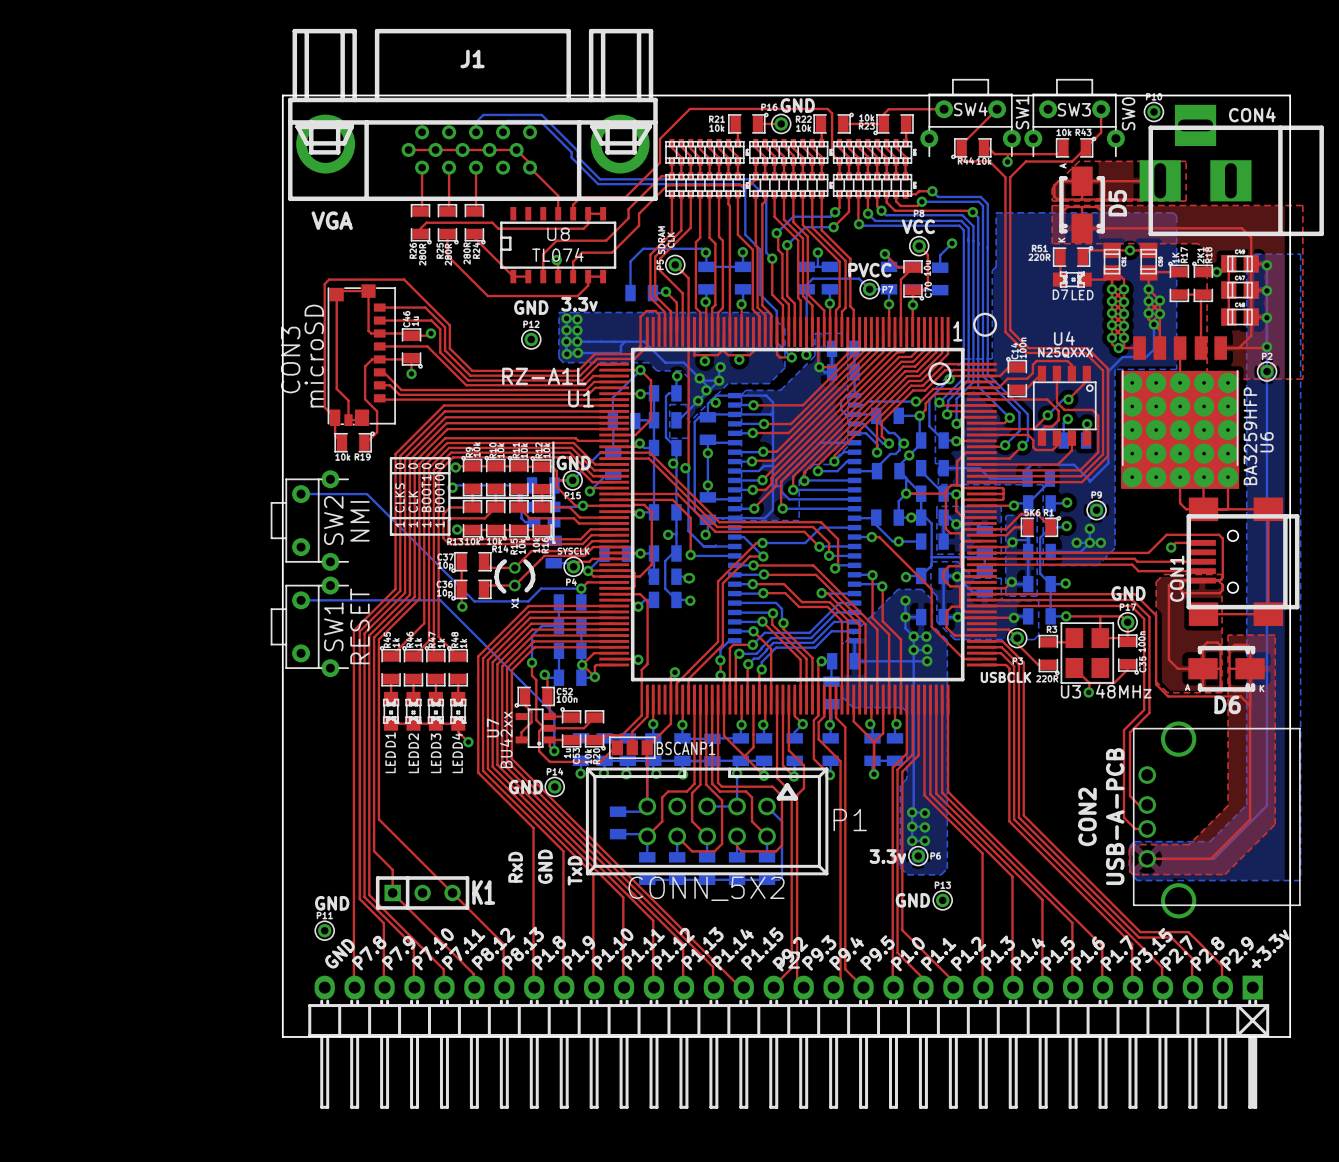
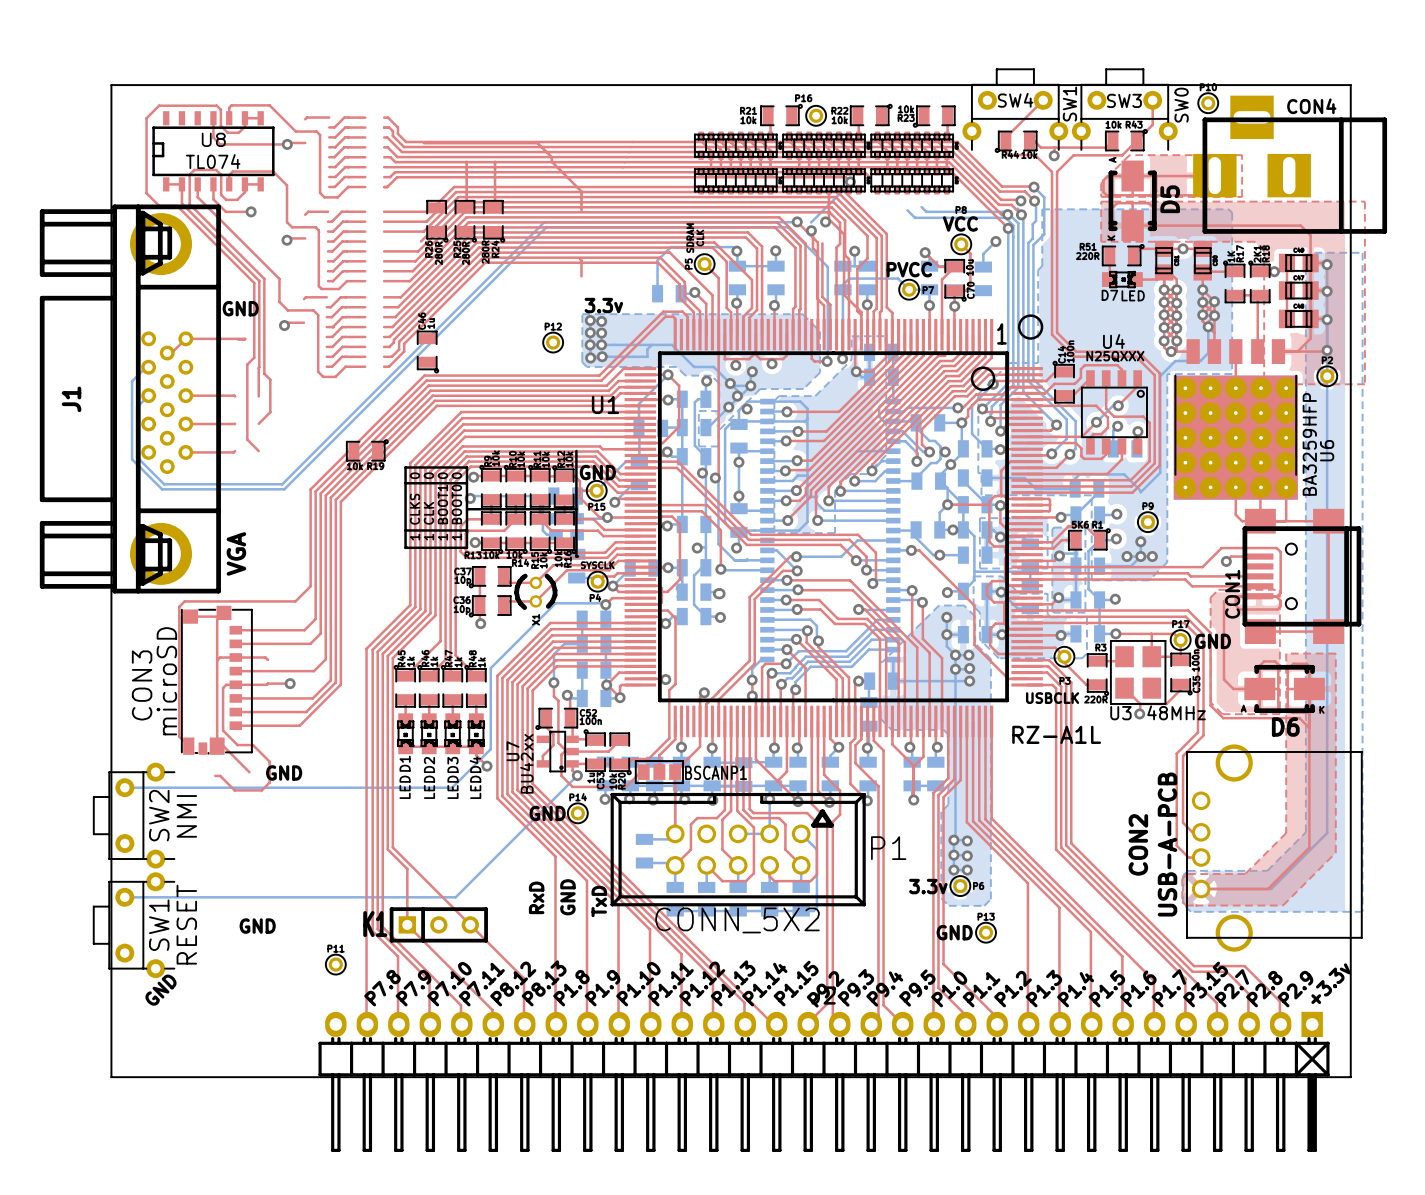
board edge: (282, 95) (1290, 95) (1290, 1036) (282, 1036) (282, 95) -> (111, 85) (111, 1077) (1350, 1077) (1350, 85) (111, 85)
text: GND (797, 105) -> none
top track: (944, 109) (888, 109) (883, 114) (883, 123) (843, 123) -> none
J1 rotation: 0° (472, 114) -> 90° counterclockwise (130, 398)
J1 position: (472, 114) -> (130, 398)
top track: (758, 123) (781, 123) -> none
top track: none -> (329, 117) (307, 117) (305, 119)
top track: none -> (365, 117) (344, 117) (334, 127) (329, 127)
top track: none -> (384, 117) (388, 117) (397, 127) (397, 133) (406, 141) (957, 141) (1002, 186) (1034, 187)
top track: none -> (213, 118) (213, 137) (220, 144) (305, 142)
top track: none -> (229, 118) (229, 107) (231, 105) (269, 105) (295, 131) (316, 131) (320, 135) (320, 192) (324, 197) (337, 197) (348, 186)
top track: none -> (260, 118) (244, 118) (244, 126) (238, 132) (227, 132) (220, 125) (220, 109) (216, 105) (159, 105) (146, 118) (146, 193) (159, 205) (177, 205) (254, 283) (254, 357) (247, 364) (247, 439) (258, 451)
bottom track: (476, 132) (476, 122) (483, 114) (541, 114) (577, 150) (577, 156) (600, 179) (748, 179) (766, 197) (766, 252) (772, 258) -> none
bottom track: (503, 132) (503, 125) (507, 120) (540, 120) (571, 152) (571, 157) (598, 184) (739, 184) (745, 189) (745, 234) (760, 249) (760, 294) (776, 311) (776, 342) (791, 357) -> none
top track: none -> (365, 127) (345, 127) (335, 137) (329, 137)
top track: none -> (384, 127) (389, 127) (392, 131) (392, 135) (404, 147) (955, 147) (999, 191) (1025, 191) (1034, 201)
top track: none -> (365, 137) (345, 137) (335, 147) (329, 147)
top track: none -> (384, 137) (387, 137) (401, 152) (953, 152) (1001, 199) (1020, 200)
via: none -> (287, 144)
top track: none -> (365, 147) (344, 147) (334, 157) (329, 157)
top track: none -> (384, 147) (387, 147) (397, 157) (951, 157) (998, 204) (1011, 204) (1021, 214)
top track: (671, 161) (671, 176) (661, 176) (628, 209) (628, 218) (606, 240) (556, 240) (543, 254) (543, 276) -> none
top track: (755, 161) (755, 179) (749, 185) (667, 185) (639, 213) (639, 225) (612, 252) (582, 252) (573, 261) (573, 276) -> none
top track: none -> (348, 157) (345, 157) (335, 167) (329, 167)
top track: none -> (348, 157) (365, 157)
top track: none -> (384, 157) (390, 157) (395, 162) (949, 162) (1001, 214) (1007, 214)
top track: (422, 167) (422, 209) (420, 211) -> none
top track: none -> (348, 167) (345, 167) (335, 177) (329, 177)
top track: none -> (348, 167) (365, 167)
top track: none -> (384, 167) (947, 167) (1008, 228)
top track: (839, 176) (839, 161) (832, 153) (832, 113) (827, 108) (689, 108) (660, 138) (660, 162) (625, 197) (580, 197) (573, 204) (573, 213) -> none
top track: none -> (348, 177) (344, 177) (334, 186) (329, 186)
top track: none -> (348, 177) (365, 177)
top track: none -> (869, 176) (864, 172) (395, 172) (390, 177) (384, 177)
top track: none -> (850, 181) (845, 177) (397, 177) (387, 187)
bottom track: none -> (850, 181) (811, 222)
via: none -> (850, 181)
top track: none -> (166, 184) (181, 184) (181, 203) (259, 280) (258, 396)
top track: none -> (197, 184) (197, 197) (279, 278) (279, 301) (287, 310) (313, 310) (318, 315) (318, 371) (323, 376) (335, 376) (345, 366) (365, 366)
top track: none -> (213, 184) (213, 199) (225, 211) (251, 211)
top track: none -> (229, 184) (229, 175) (232, 171) (273, 171) (287, 185) (287, 222) (292, 227) (315, 227) (318, 230) (318, 286) (321, 289) (339, 289) (346, 281) (365, 281)
top track: none -> (260, 184) (244, 184) (244, 192) (237, 199) (226, 199) (221, 194) (221, 175) (216, 169) (194, 169) (189, 174) (189, 204) (264, 278) (264, 373) (270, 379) (270, 412) (258, 423)
top track: none -> (348, 187) (365, 187)
top track: (932, 191) (905, 194) -> none
bottom track: (932, 191) (938, 196) (980, 196) (987, 203) (987, 246) -> (1034, 187) (1044, 197) (1044, 234) (1033, 245)
via: (932, 191) -> none
via: none -> (1034, 187)
top track: (671, 194) (671, 233) (650, 254) (650, 297) (665, 312) -> (384, 366) (389, 366) (404, 351) (404, 343) (485, 262) (657, 262) (679, 284) (679, 298) (693, 313)
top track: (681, 194) (681, 230) (655, 256) (655, 295) (670, 311) -> (384, 356) (391, 356) (399, 349) (399, 341) (483, 257) (660, 257) (684, 282) (684, 295) (700, 313)
top track: (690, 194) (690, 227) (660, 258) (660, 270) (682, 294) -> (384, 346) (389, 346) (393, 339) (481, 252) (669, 252) (712, 295)
top track: (700, 194) (700, 237) (695, 242) (695, 308) (700, 312) -> (384, 336) (389, 336) (479, 247) (712, 247) (726, 261) (726, 307) (731, 314)
top track: (709, 194) (709, 237) (715, 243) (715, 305) (712, 308) (712, 314) -> (384, 327) (392, 327) (476, 242) (714, 242) (752, 280) (752, 308) (743, 316)
top track: (719, 194) (719, 236) (722, 240) (722, 308) (718, 315) -> (384, 317) (395, 317) (474, 237) (745, 237) (757, 248) (757, 310) (749, 317)
top track: (728, 194) (729, 248) -> (384, 307) (398, 307) (472, 232) (747, 232) (762, 246)
top track: (737, 194) (737, 234) (752, 249) (752, 309) (759, 316) -> (384, 297) (400, 297) (470, 227) (775, 227) (795, 247) (795, 306) (793, 308) (793, 317)
top track: (755, 194) (757, 307) (765, 315) -> (384, 281) (409, 281) (468, 222) (777, 222) (800, 245) (799, 317)
top track: (765, 194) (765, 201) (762, 204) (762, 305) (771, 314) -> (384, 271) (412, 271) (466, 217) (779, 217) (805, 243) (805, 316)
top track: (774, 194) (774, 216) (798, 240) (798, 298) (800, 300) -> (384, 261) (415, 261) (464, 212) (829, 212) (840, 222) (840, 243) (836, 247) (836, 301)
top track: (784, 194) (784, 219) (803, 238) (803, 296) (812, 305) -> (384, 251) (418, 251) (462, 207) (831, 207) (845, 220) (845, 255) (848, 259) (848, 306)
top track: (802, 194) (802, 224) (839, 261) (839, 306) (836, 310) -> (384, 231) (423, 231) (458, 197) (835, 197) (876, 238) (876, 308) (873, 311)
top track: (812, 194) (812, 227) (845, 260) (845, 308) (841, 311) -> (384, 221) (426, 221) (456, 192) (837, 192) (881, 235) (881, 310) (879, 313)
top track: (821, 194) (821, 230) (850, 258) (850, 306) (853, 311) -> (384, 211) (429, 211) (454, 187) (839, 187) (886, 233) (886, 307) (892, 312)
top track: (839, 194) (839, 207) (835, 212) -> none
top track: (848, 194) (848, 211) (833, 227) -> none
top track: (858, 194) (859, 224) -> none
top track: (867, 194) (868, 213) -> none
top track: (877, 194) (877, 206) (881, 210) -> none
top track: (886, 194) (886, 202) (894, 210) (972, 212) -> none
top track: (896, 194) (896, 201) (900, 205) (917, 205) (921, 201) -> none
bottom track: (921, 201) (978, 201) (983, 205) (983, 244) -> (1034, 201) (1036, 220) (1032, 224) (1032, 238) (1028, 242)
via: (921, 201) -> none
via: none -> (1020, 200)
via: none -> (1034, 201)
via: (881, 210) -> none
bottom track: (835, 212) (830, 216) (793, 216) (776, 233) -> none
via: (835, 212) -> none
via: (972, 212) -> none
top track: (603, 213) (588, 213) (588, 224) (583, 228) (498, 228) (492, 222) (426, 222) -> (861, 315) (857, 311) (857, 268) (867, 258) (867, 236) (833, 202) (460, 202) (442, 219)
via: (868, 213) -> none
via: none -> (251, 211)
top track: none -> (328, 211) (308, 211) (305, 214)
top track: none -> (365, 211) (341, 211) (331, 221) (328, 221)
via: none -> (1007, 214)
via: none -> (1021, 214)
top track: none -> (365, 221) (343, 221) (333, 231) (328, 231)
bottom track: none -> (797, 221) (544, 222) (282, 484) (164, 484) (137, 457) (137, 407) (148, 395)
via: none -> (797, 221)
via: none -> (825, 221)
bottom track: (859, 224) (959, 225) (963, 230) -> none
via: (859, 224) -> none
bottom track: (833, 227) (805, 227) (787, 245) -> none
via: (833, 227) -> none
via: none -> (1008, 228)
top track: (447, 233) (447, 255) (487, 296) (577, 296) (588, 285) (588, 276) (603, 276) -> none
top track: (474, 233) (474, 237) (513, 276) (528, 276) -> none
top track: none -> (365, 231) (343, 231) (333, 241) (328, 241)
top track: none -> (305, 238) (288, 238) (287, 240)
via: none -> (287, 240)
top track: none -> (365, 241) (342, 241) (332, 251) (328, 251)
U8 position: (558, 245) -> (213, 151)
via: (787, 245) -> none
top track: none -> (365, 251) (343, 251) (333, 261) (328, 261)
top track: (772, 258) (772, 294) (782, 305) -> (797, 221) (817, 242) (817, 306)
via: (772, 258) -> none
via: (556, 260) -> none
top track: none -> (365, 261) (343, 261) (333, 271) (328, 271)
top track: none -> (365, 271) (342, 271) (332, 281) (328, 281)
top track: none -> (326, 297) (305, 297) (303, 299)
top track: none -> (365, 297) (340, 297) (330, 307) (326, 307)
top track: none -> (365, 307) (341, 307) (331, 317) (326, 317)
text: none -> GND (240, 308)
top track: (379, 307) (425, 307) (445, 327) (445, 350) (470, 375) -> (235, 630) (304, 630) (315, 619) (315, 491) (426, 380) (488, 380)
text: GND (531, 307) -> none
top track: (659, 314) (655, 311) (646, 311) (640, 317) (640, 346) (632, 354) (594, 354) (578, 370) (575, 370) -> (687, 316) (682, 311) (663, 311) (599, 375)
top track: none -> (365, 317) (342, 317) (332, 327)
top track: none -> (303, 322) (287, 322) (284, 325)
top track: (379, 320) (431, 320) (440, 329) (440, 352) (468, 380) -> (235, 643) (310, 643) (320, 633) (320, 493) (428, 385) (486, 385)
via: none -> (284, 325)
top track: none -> (326, 327) (333, 327)
top track: none -> (365, 327) (342, 327) (332, 336) (326, 336)
top track: (647, 331) (647, 346) (634, 358) (596, 358) (580, 375) (577, 375) -> (675, 334) (675, 318) (673, 316) (665, 316) (601, 380)
top track: (430, 333) (428, 335) (371, 333) (368, 330) (368, 291) (340, 291) (336, 294) (336, 388) (348, 400) (348, 420) (359, 420) -> (189, 746) (179, 736) (179, 606) (184, 601) (295, 601) (310, 586) (310, 489) (372, 427)
via: (430, 333) -> none
top track: none -> (365, 336) (342, 336) (332, 346) (326, 346)
top track: none -> (238, 339) (245, 338) (185, 338) (171, 353)
top track: none -> (365, 346) (342, 346) (332, 356) (326, 356)
top track: (379, 346) (427, 346) (466, 385) -> (235, 671) (313, 671) (325, 659) (325, 495) (430, 390) (484, 390)
top track: none -> (365, 356) (342, 356) (332, 366) (326, 366)
CON3 position: (361, 355) -> (216, 680)
bottom track: none -> (829, 360) (827, 266) (788, 227) (546, 227) (284, 489) (162, 489) (132, 459) (132, 381) (146, 367) (148, 367)
top track: (472, 370) (449, 348) (449, 325) (404, 279) (329, 279) (324, 284) (324, 407) (335, 417) (335, 435) (341, 442) -> (491, 375) (424, 375) (375, 424)
top track: (379, 372) (383, 372) (401, 390) (416, 390) -> (235, 698) (312, 698) (330, 680) (330, 497) (432, 395)
top track: (411, 373) (411, 358) (372, 359) (365, 366) (365, 399) (377, 411) (377, 432) (364, 442) -> none
via: (411, 373) -> none
U1 value position: RZ-A1L (544, 376) -> RZ-A1L (1056, 734)
top track: (379, 385) (390, 385) (399, 394) (418, 394) -> (235, 712) (306, 712) (335, 682) (335, 499) (434, 400)
top track: none -> (185, 395) (235, 396)
top track: (379, 398) (420, 399) -> (235, 725) (299, 725) (340, 684) (340, 501) (436, 405)
top track: none -> (235, 423) (185, 424)
top track: none -> (235, 451) (185, 452)
bottom track: (301, 494) (367, 494) (474, 601) (528, 601) (541, 588) (581, 588) -> (124, 787) (452, 787) (490, 749) (490, 668) (555, 603) (605, 604)
SW2 position: (309, 520) -> (134, 815)
text position: GND (1128, 593) -> GND (1212, 641)
top track: none -> (224, 612) (217, 619) (217, 746) (223, 746) (249, 772)
top track: none -> (190, 616) (220, 616)
bottom track: (301, 600) (440, 600) (554, 714) (554, 751) -> (124, 897) (455, 897) (577, 775)
SW1 position: (309, 626) -> (134, 925)
top track: none -> (268, 659) (265, 657) (220, 657) (217, 660)
top track: none -> (290, 683) (226, 684) (223, 688) (223, 730) (237, 745) (253, 745) (269, 761) (269, 782) (261, 790) (234, 790) (220, 775) (215, 775)
via: none -> (290, 683)
text: none -> GND (284, 772)
top track: (374, 821) (374, 851) (392, 869) -> (387, 849) (407, 869) (407, 900)
K1 name position: K1 (483, 892) -> K1 (375, 924)
text: none -> GND (257, 926)
text: GND (332, 903) -> none
text: GND (339, 953) -> none
text: none -> GND (160, 990)

